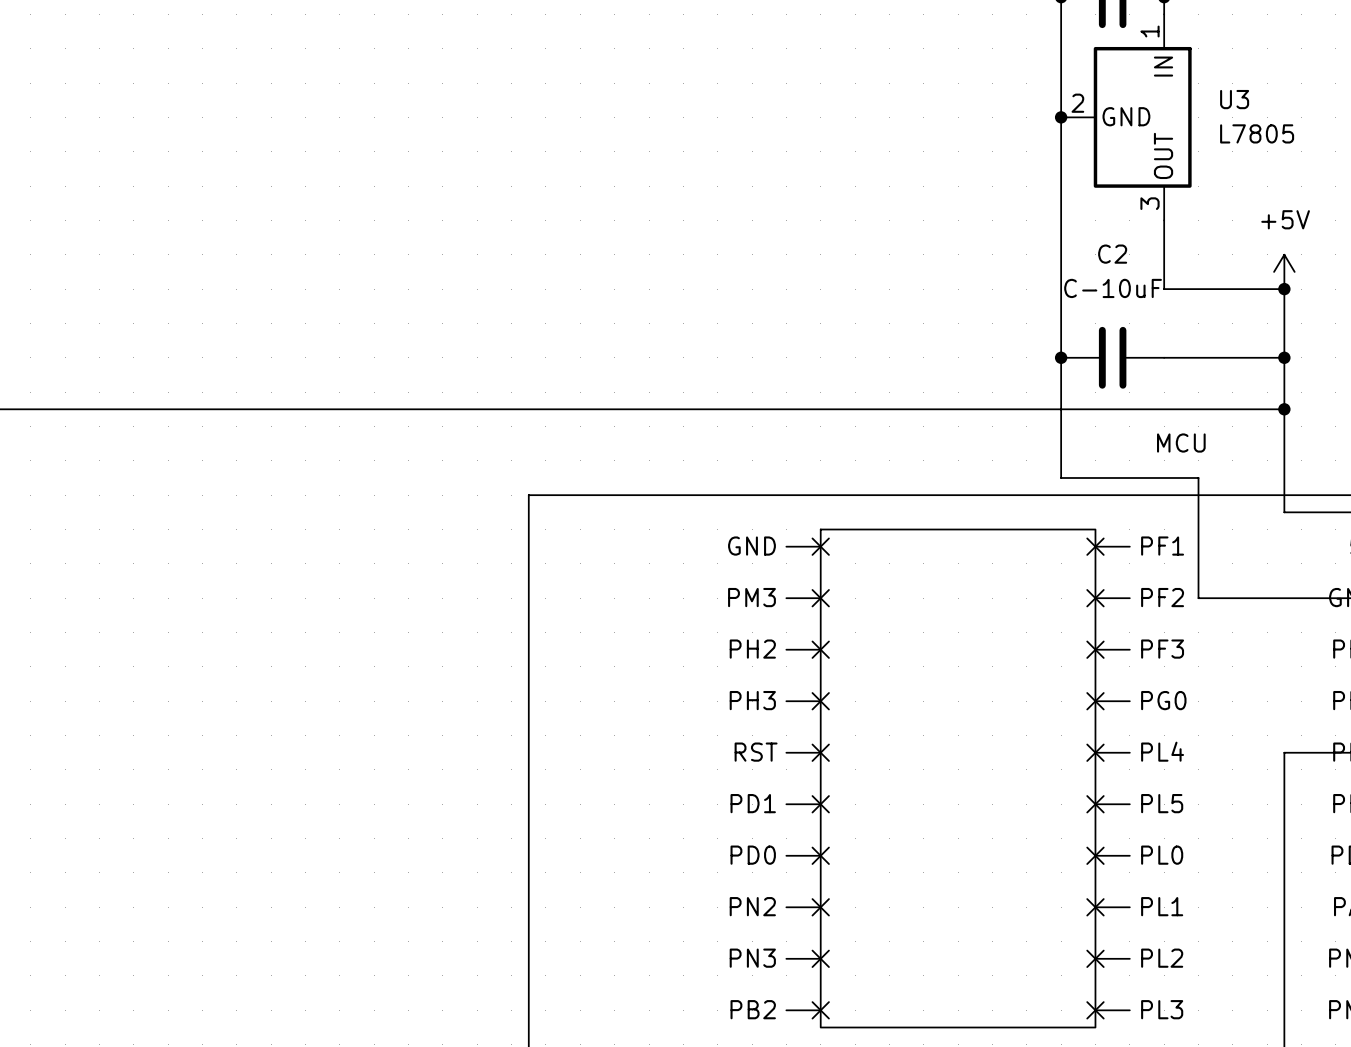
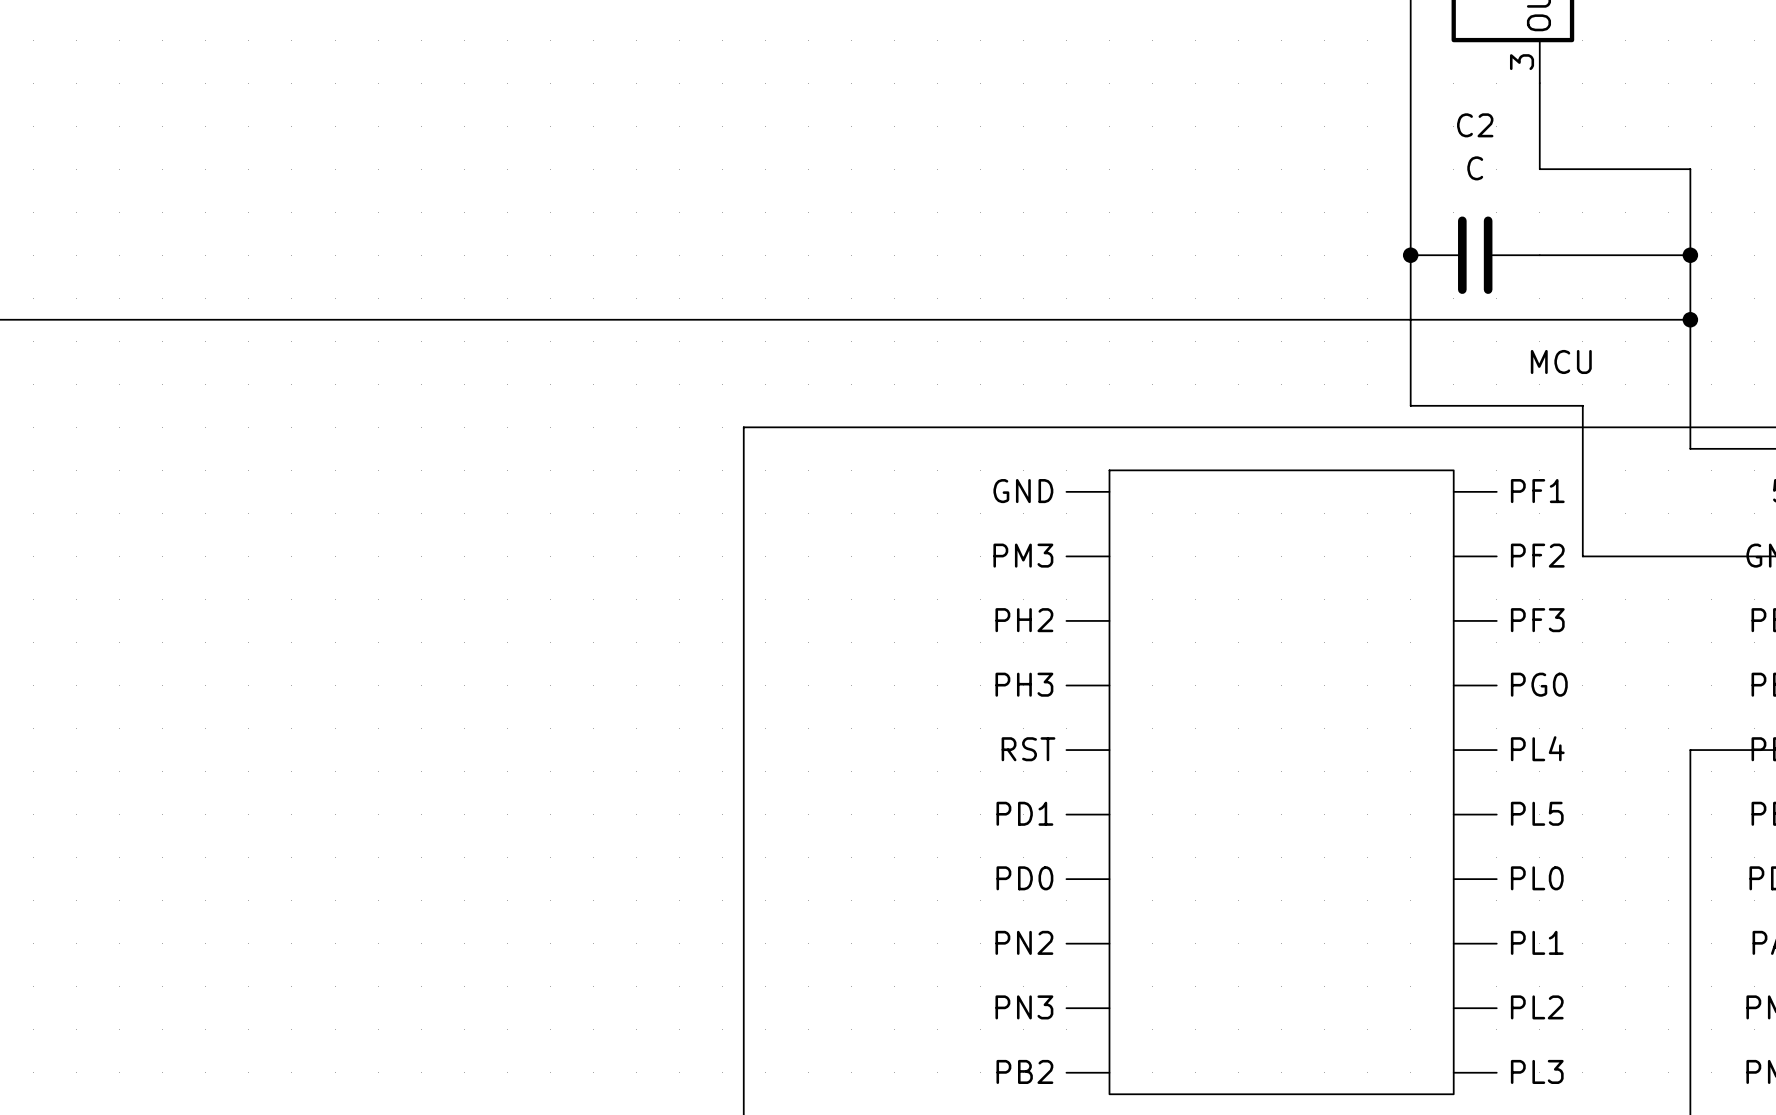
power symbol: +5V (1284, 271) -> none
C2 value: C-10uF (1113, 288) -> C (1475, 168)
junction: (1284, 289) -> none
no-connect mark: (820, 546) -> none
no-connect mark: (1095, 546) -> none
no-connect mark: (820, 598) -> none
no-connect mark: (1095, 598) -> none
no-connect mark: (820, 649) -> none
no-connect mark: (1095, 649) -> none
no-connect mark: (820, 701) -> none
no-connect mark: (1095, 701) -> none
no-connect mark: (820, 752) -> none
no-connect mark: (1095, 752) -> none
no-connect mark: (820, 804) -> none
no-connect mark: (1095, 804) -> none
no-connect mark: (820, 855) -> none
no-connect mark: (1095, 855) -> none
no-connect mark: (820, 907) -> none
no-connect mark: (1095, 907) -> none
no-connect mark: (820, 958) -> none
no-connect mark: (1095, 958) -> none
no-connect mark: (820, 1010) -> none
no-connect mark: (1095, 1010) -> none

